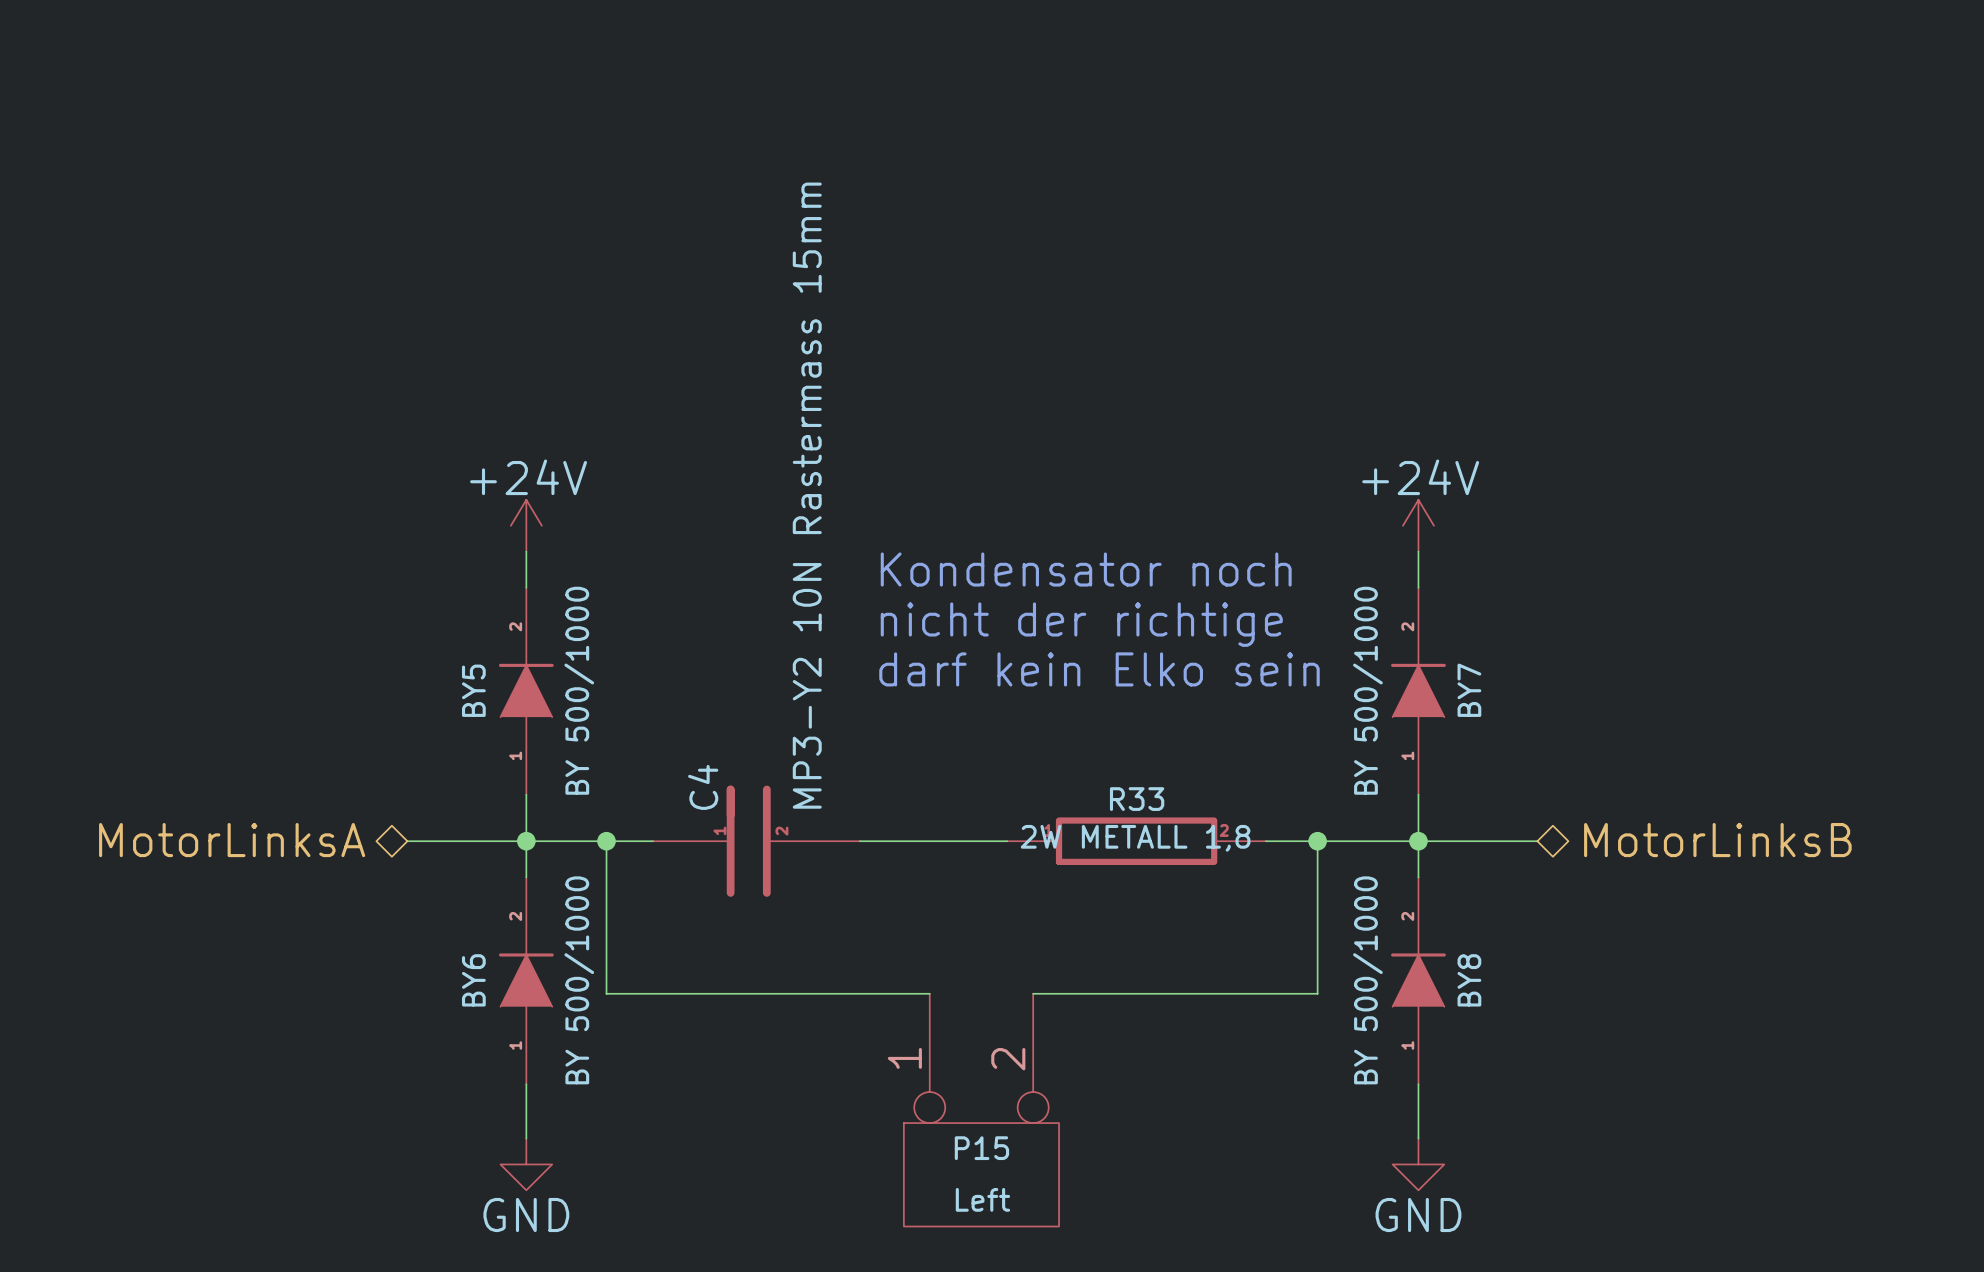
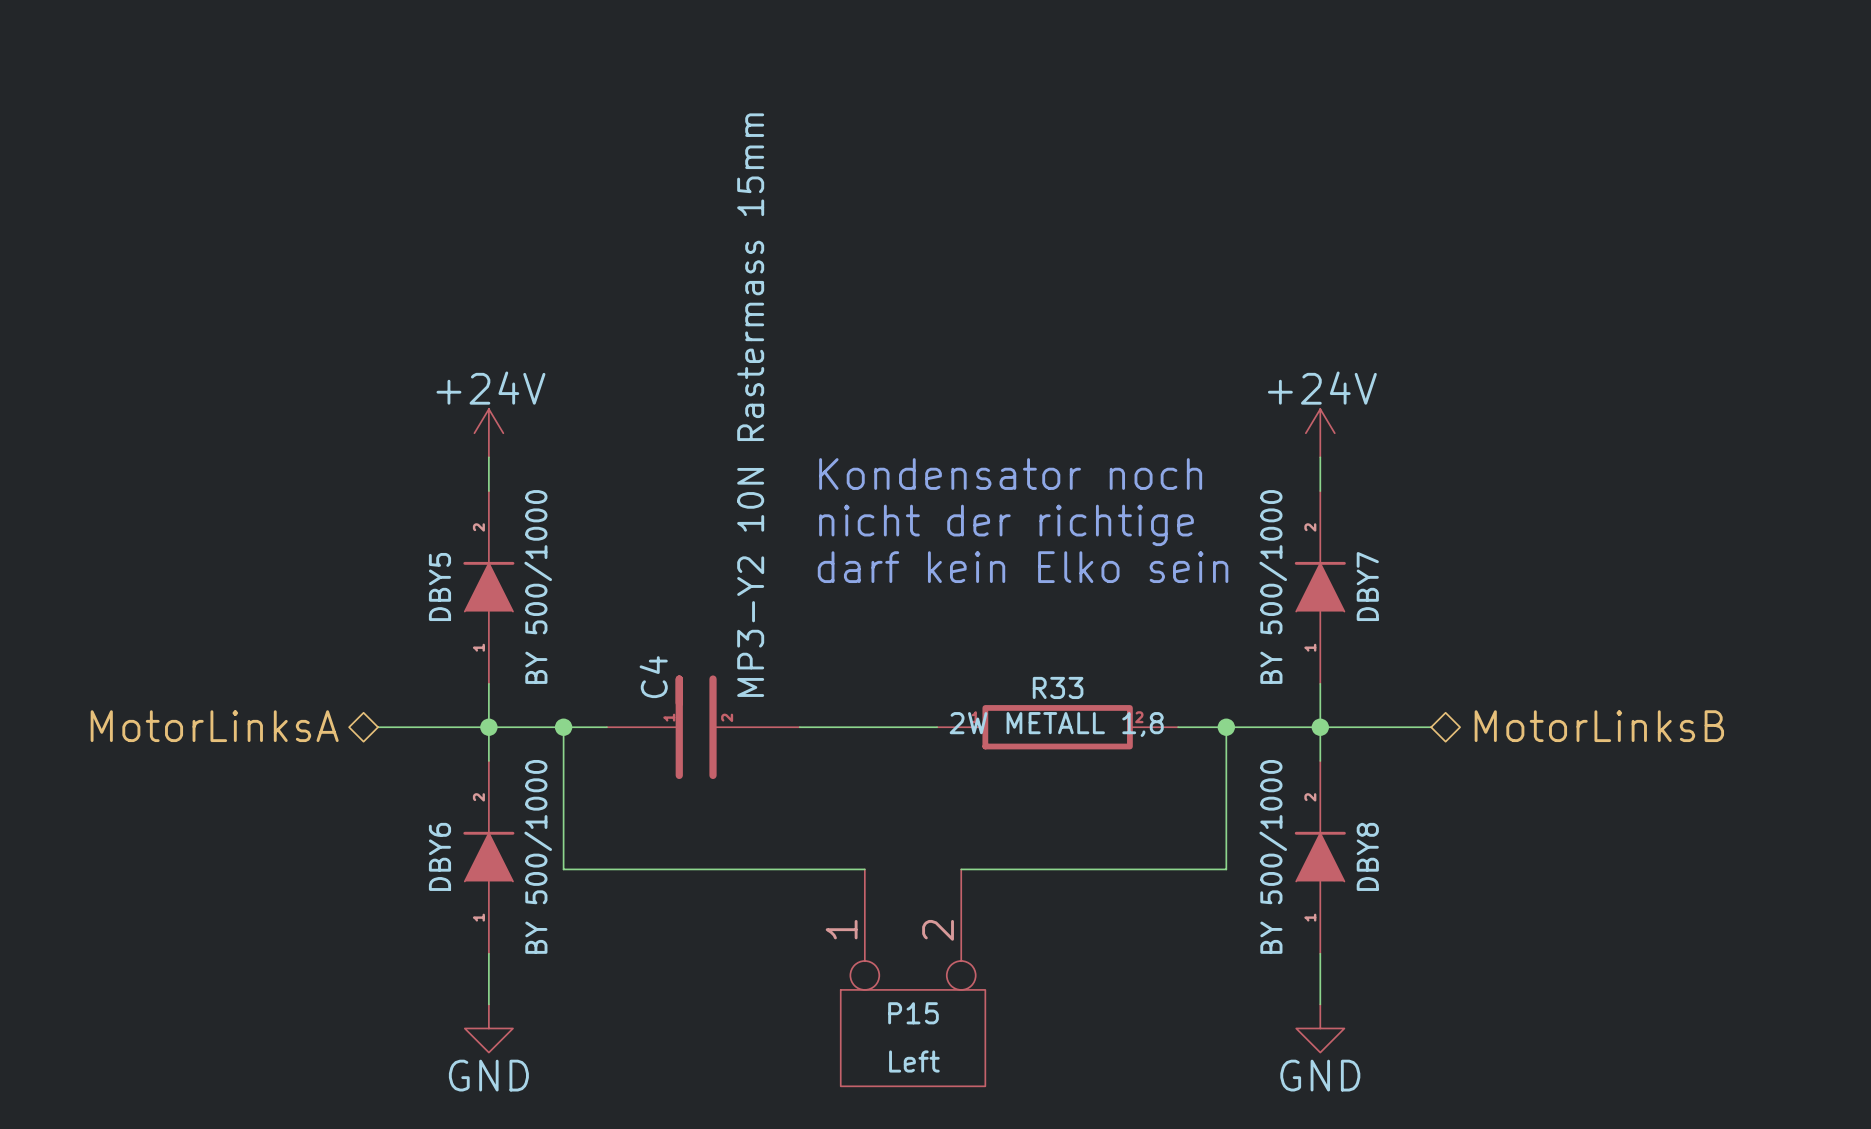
BY5 name: BY5 (473, 690) -> DBY5 (439, 587)
BY7 name: BY7 (1469, 690) -> DBY7 (1367, 586)
BY6 name: BY6 (473, 980) -> DBY6 (439, 856)
BY8 name: BY8 (1469, 980) -> DBY8 (1367, 856)

